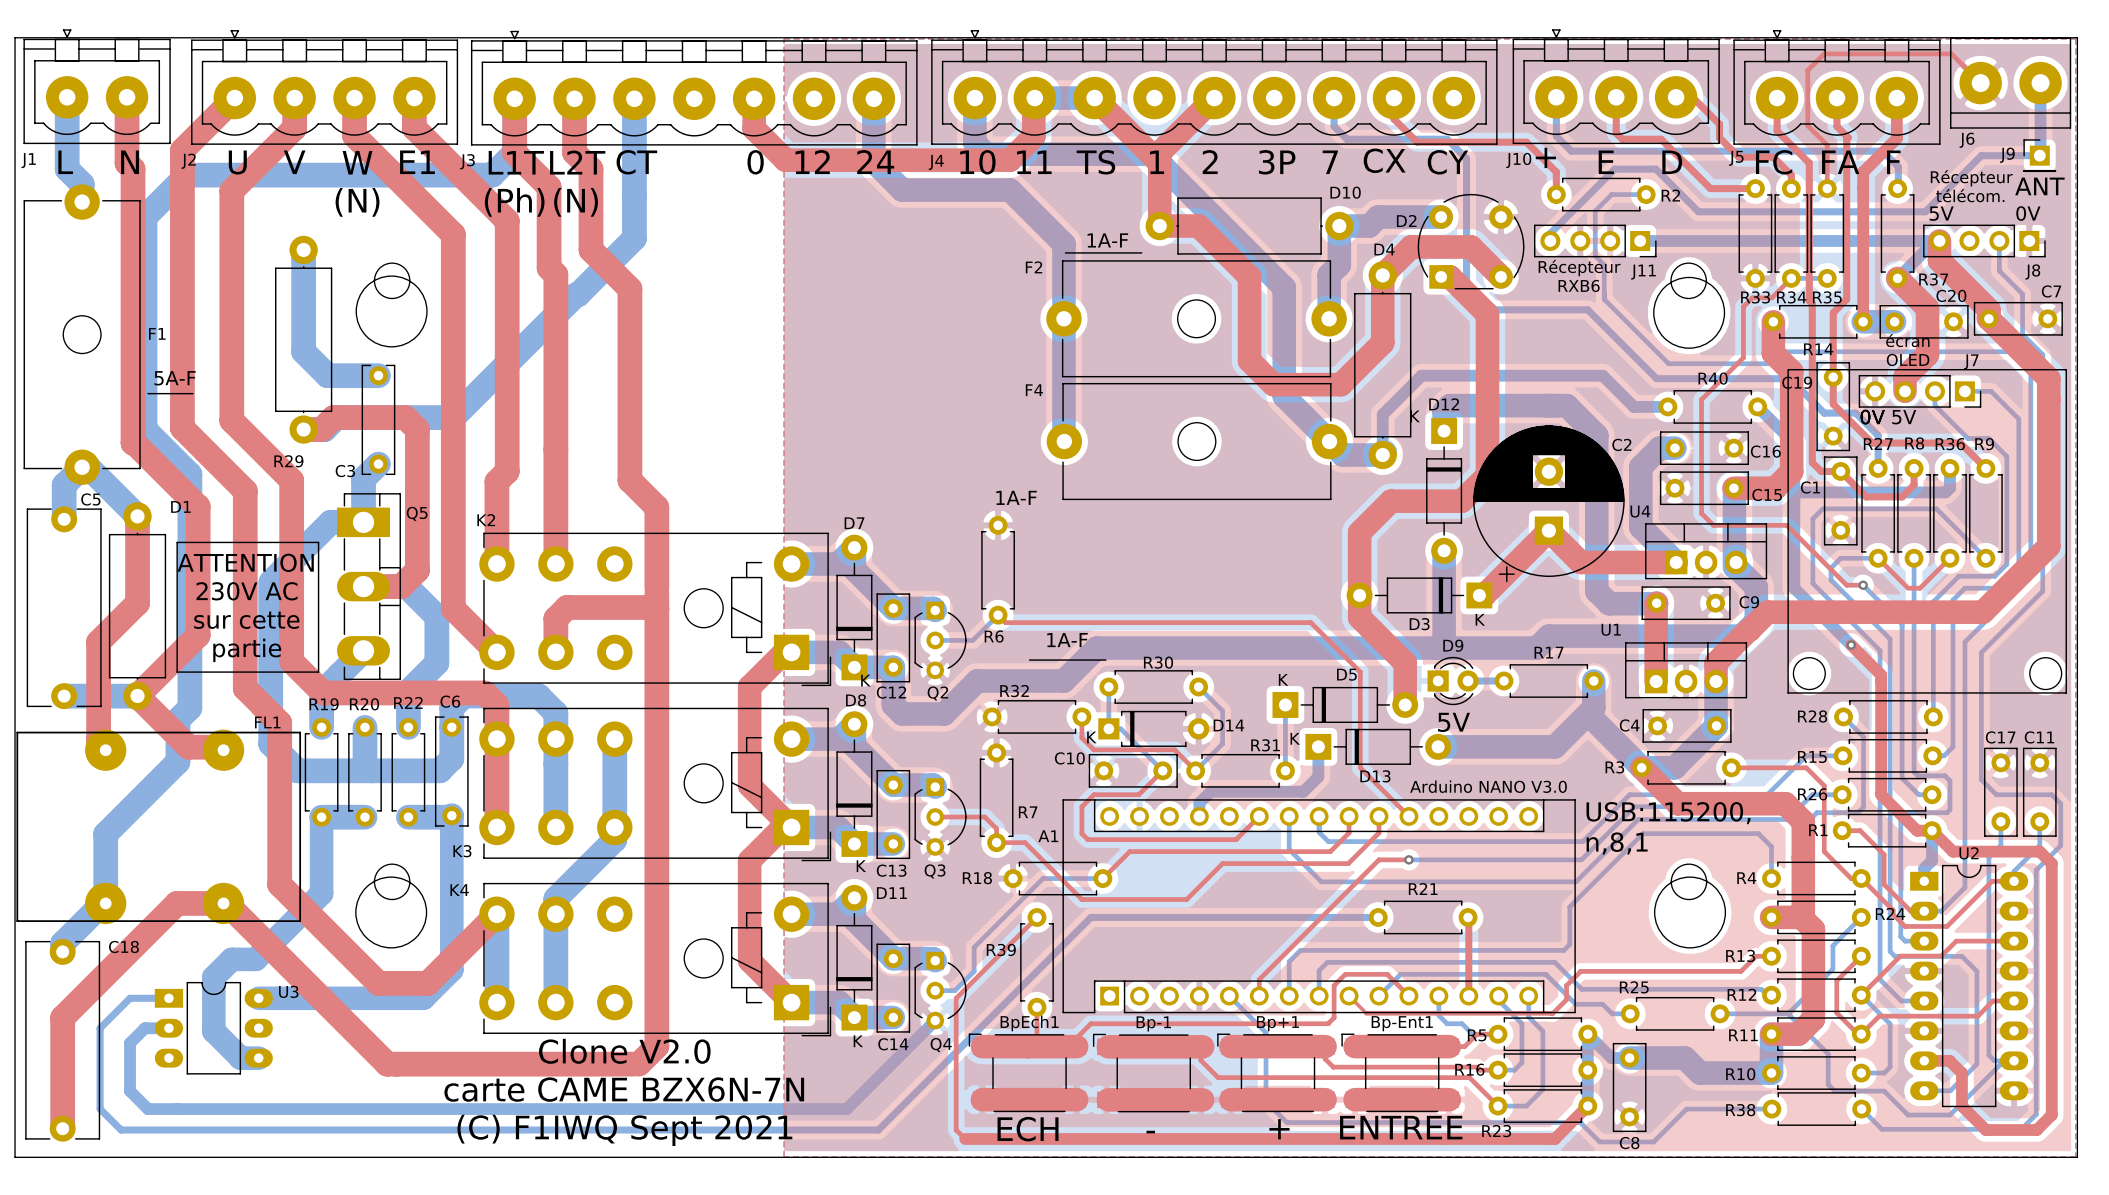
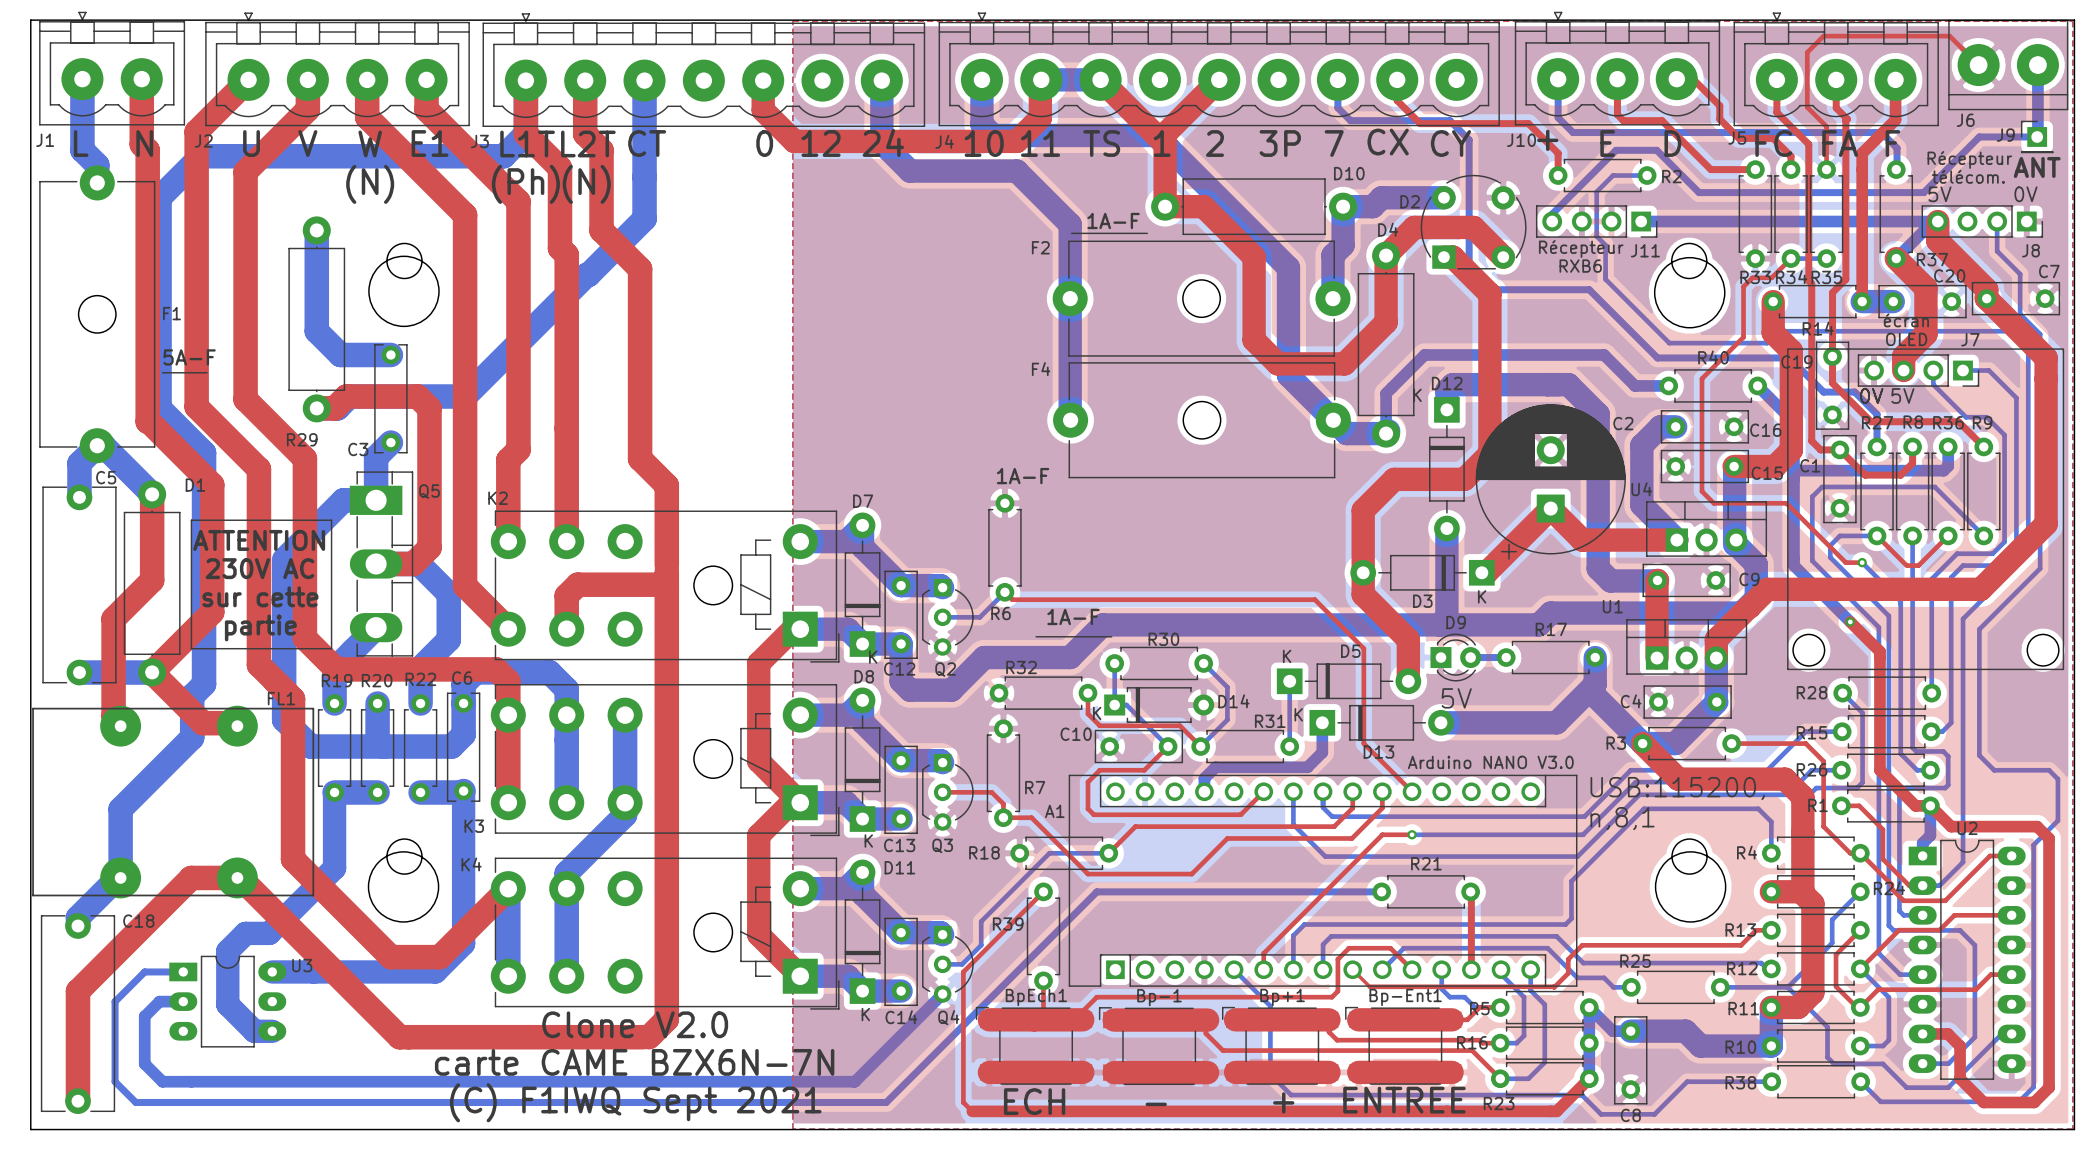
C17: (2000, 792) -> none
C11: (2039, 792) -> none
bottom track: (2000, 821) (2000, 845) (1988, 857) (1988, 1055) (1994, 1060) (2004, 1060) -> none
bottom track: (2039, 821) (2039, 845) (2014, 871) (2014, 881) -> none

